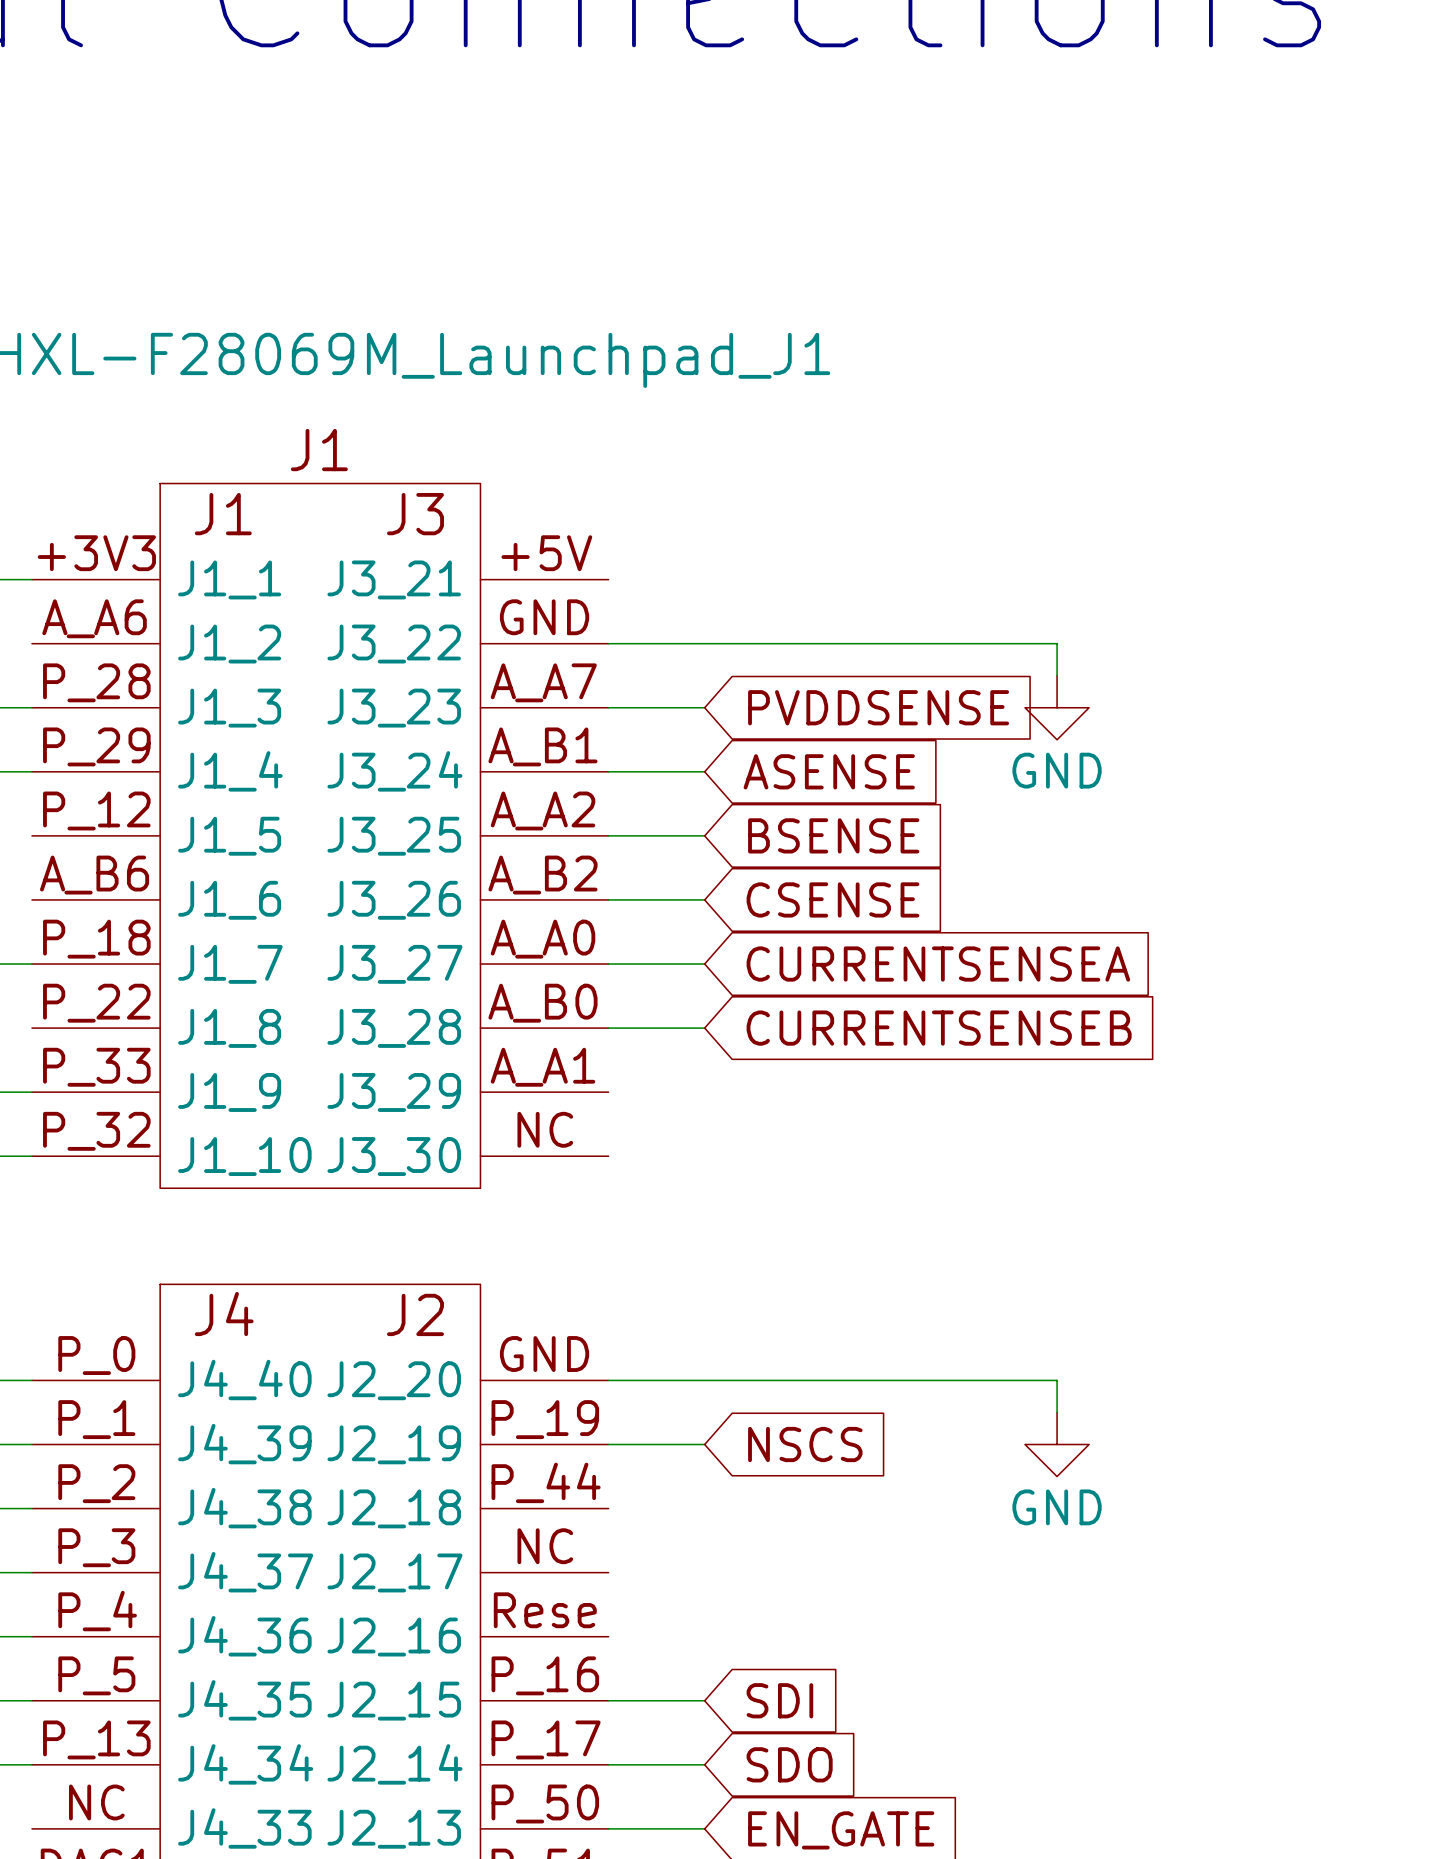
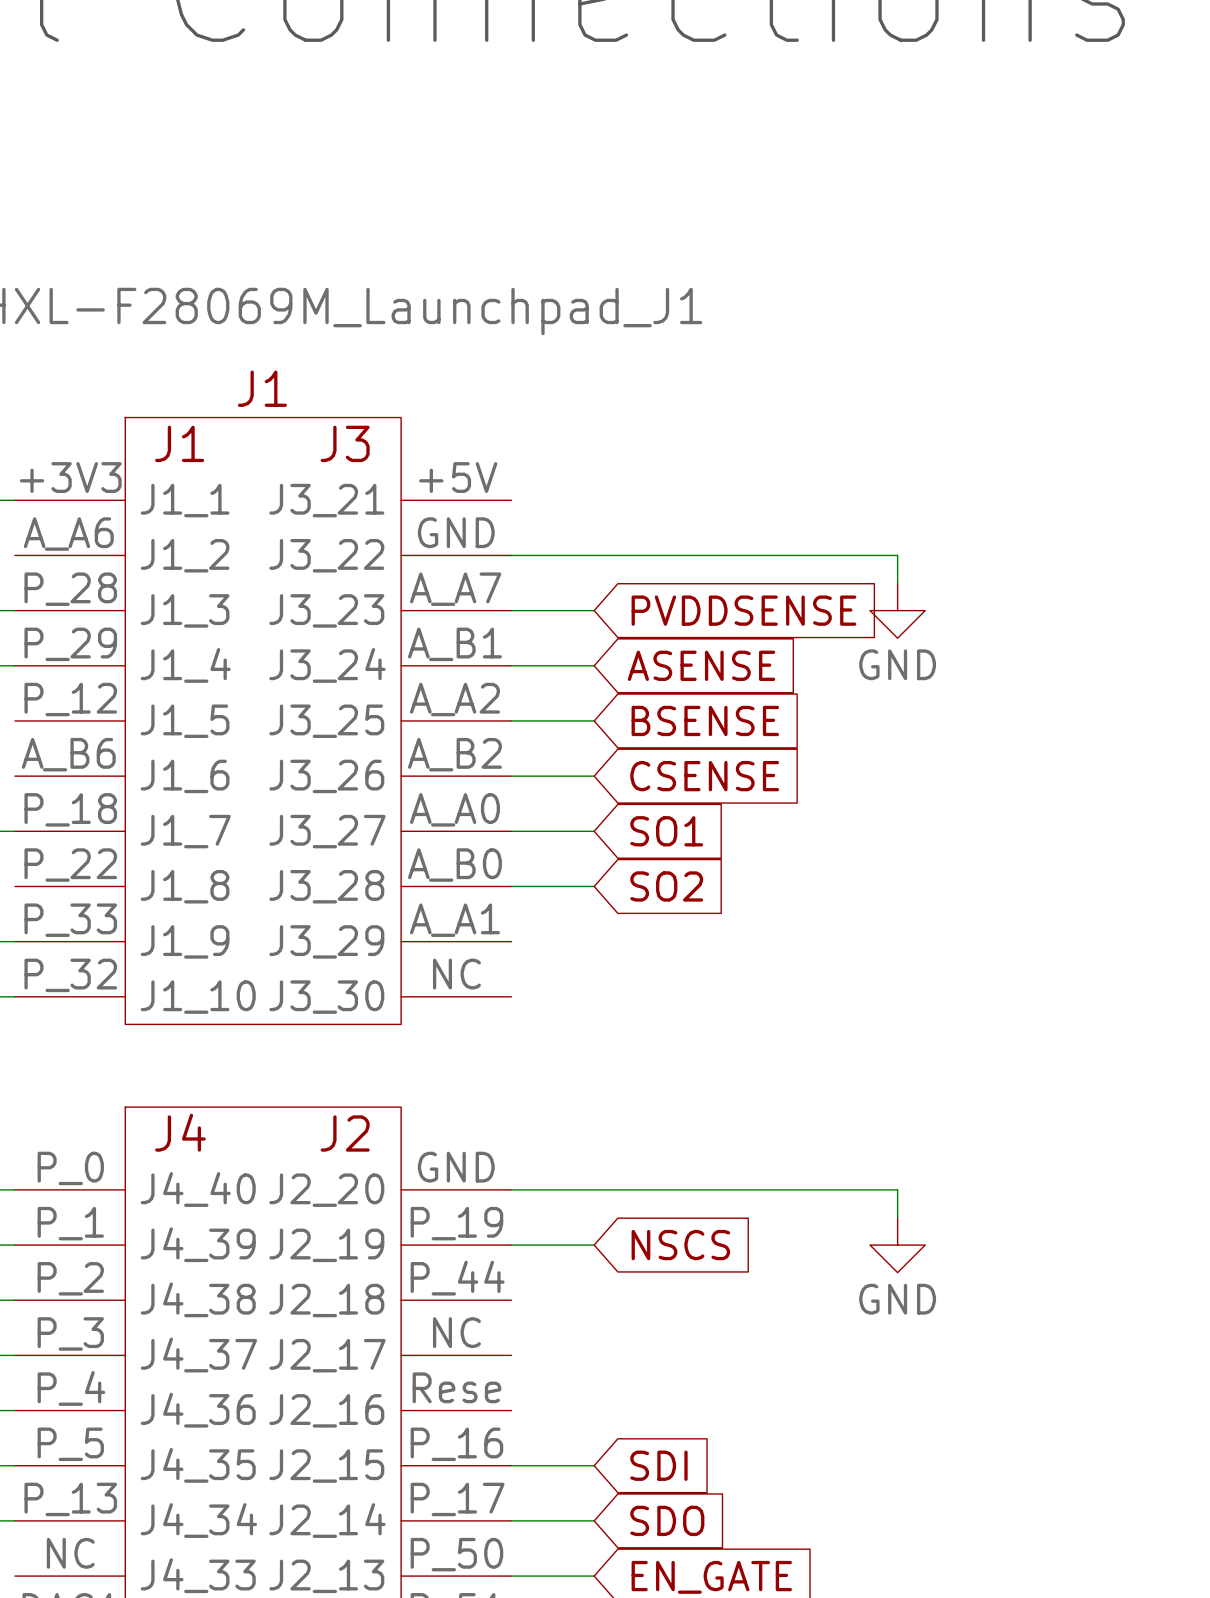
global label: CURRENTSENSEA (938, 964) -> SO1 (666, 831)
global label: CURRENTSENSEB (939, 1028) -> SO2 (666, 886)

